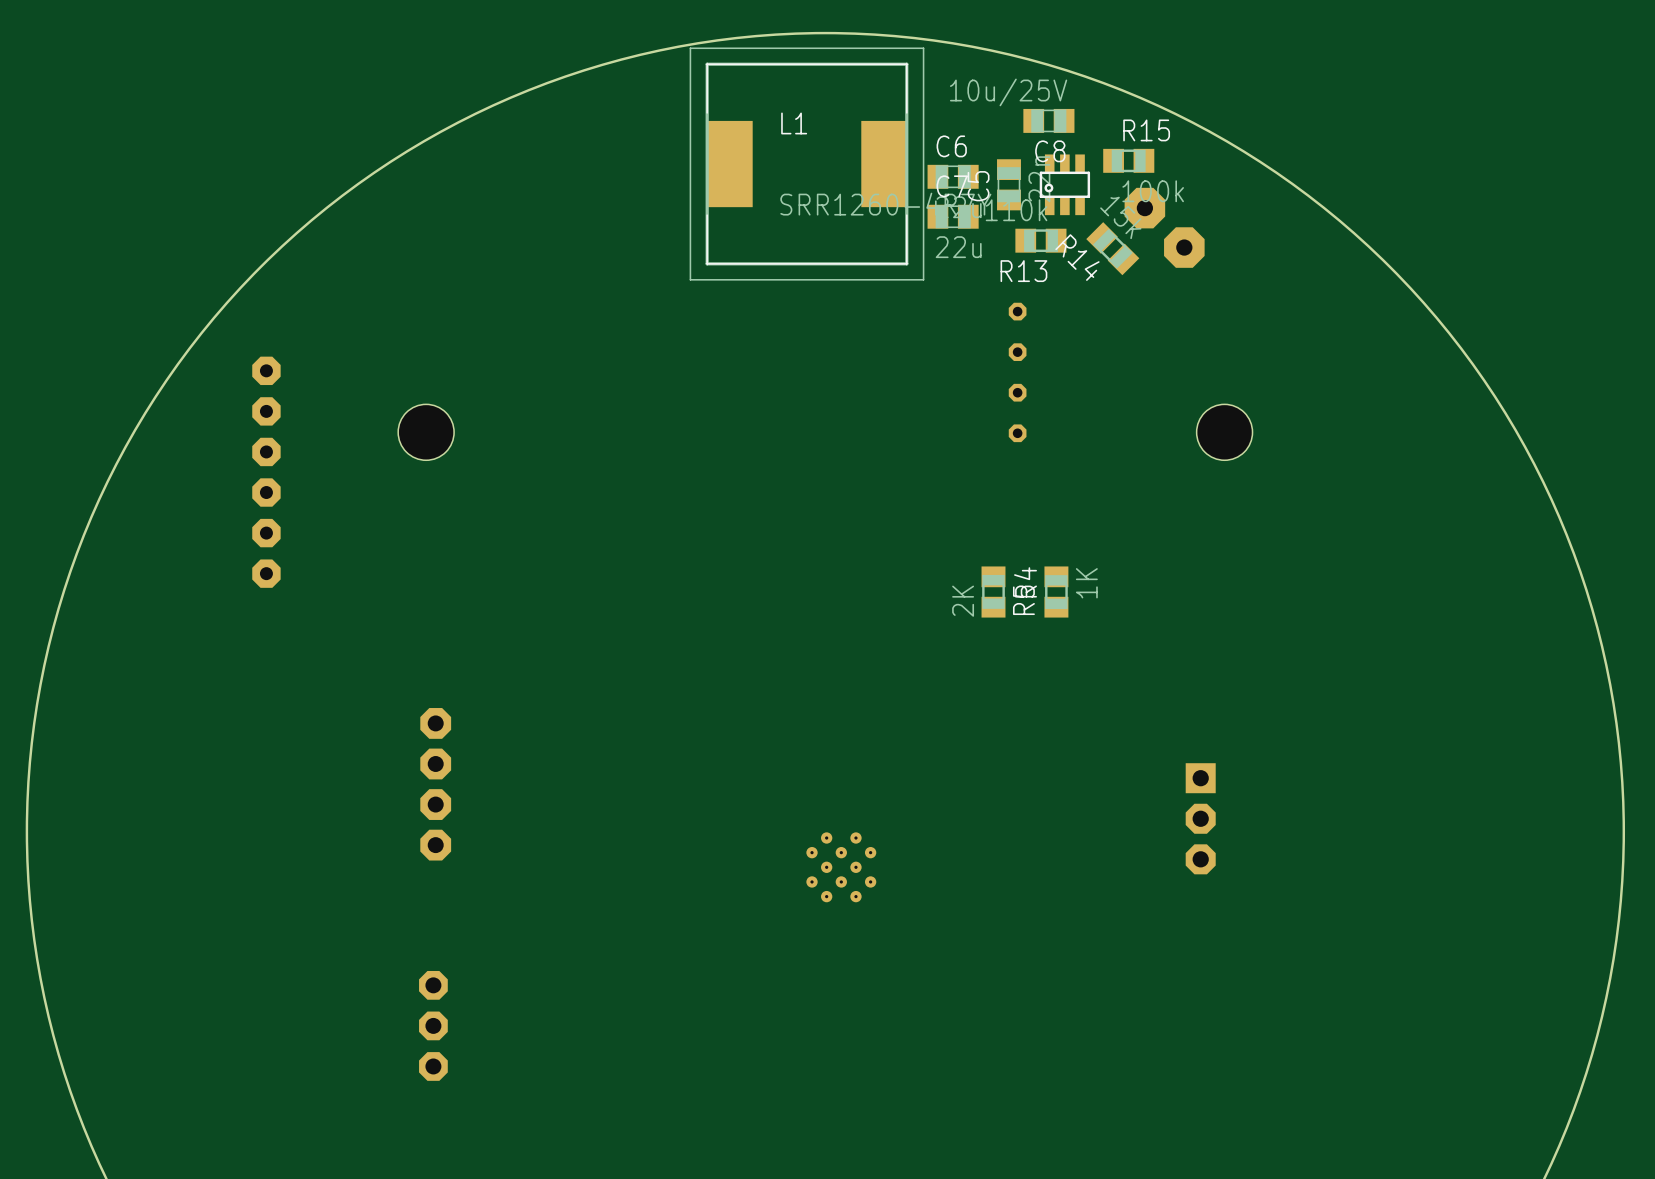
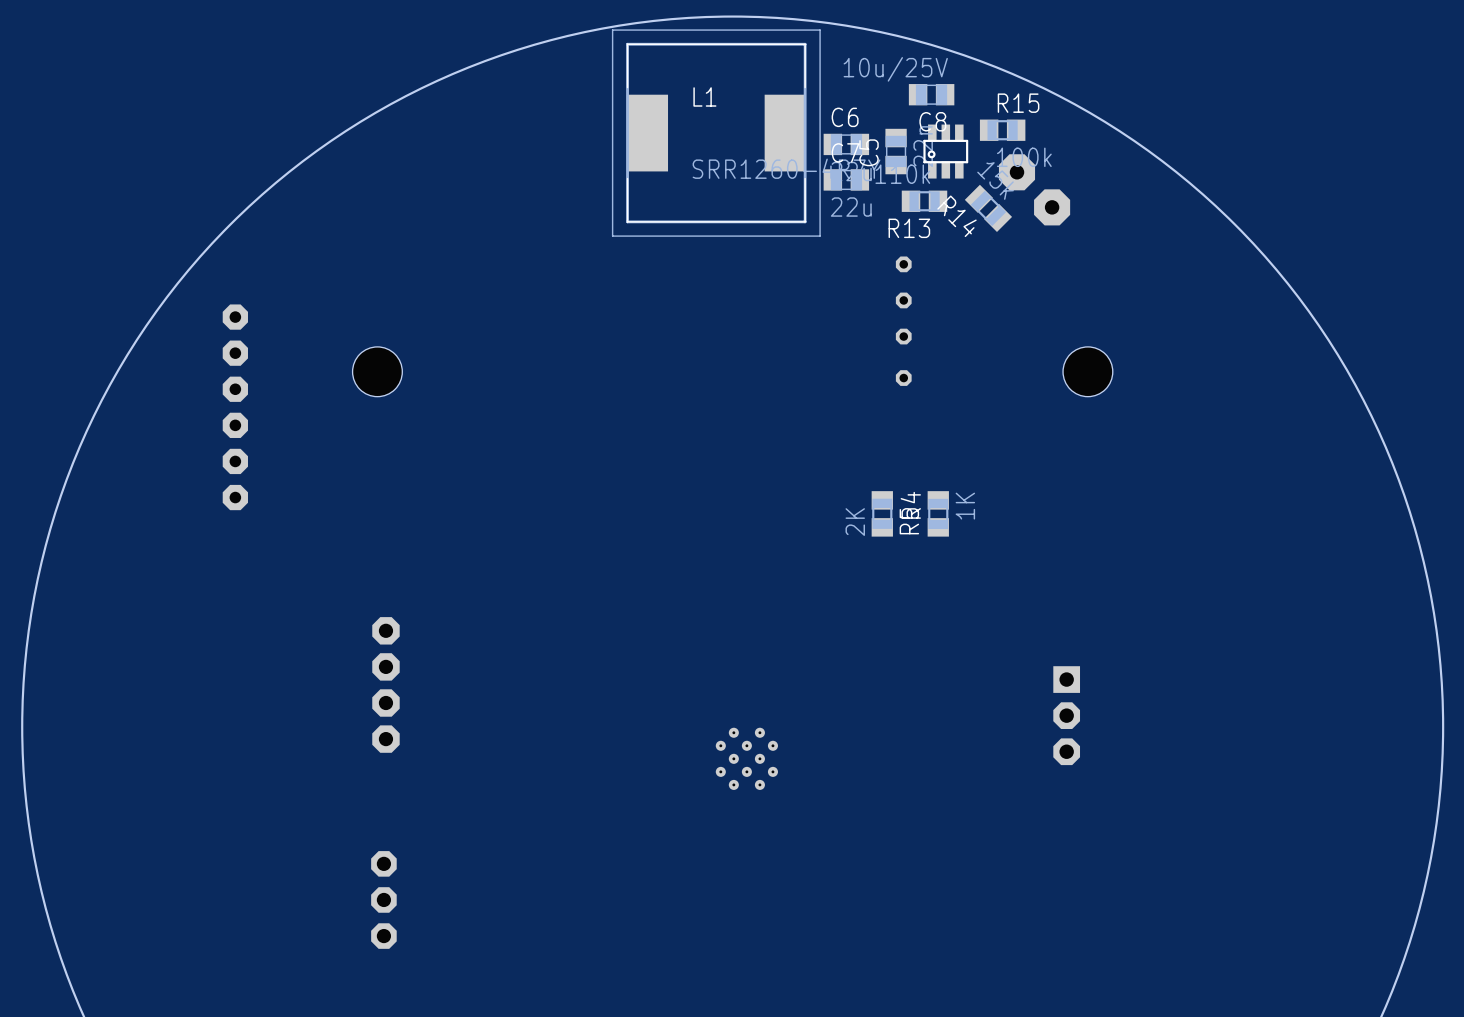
part footprint: [1008, 302, 1027, 443] -> [895, 256, 912, 386]

